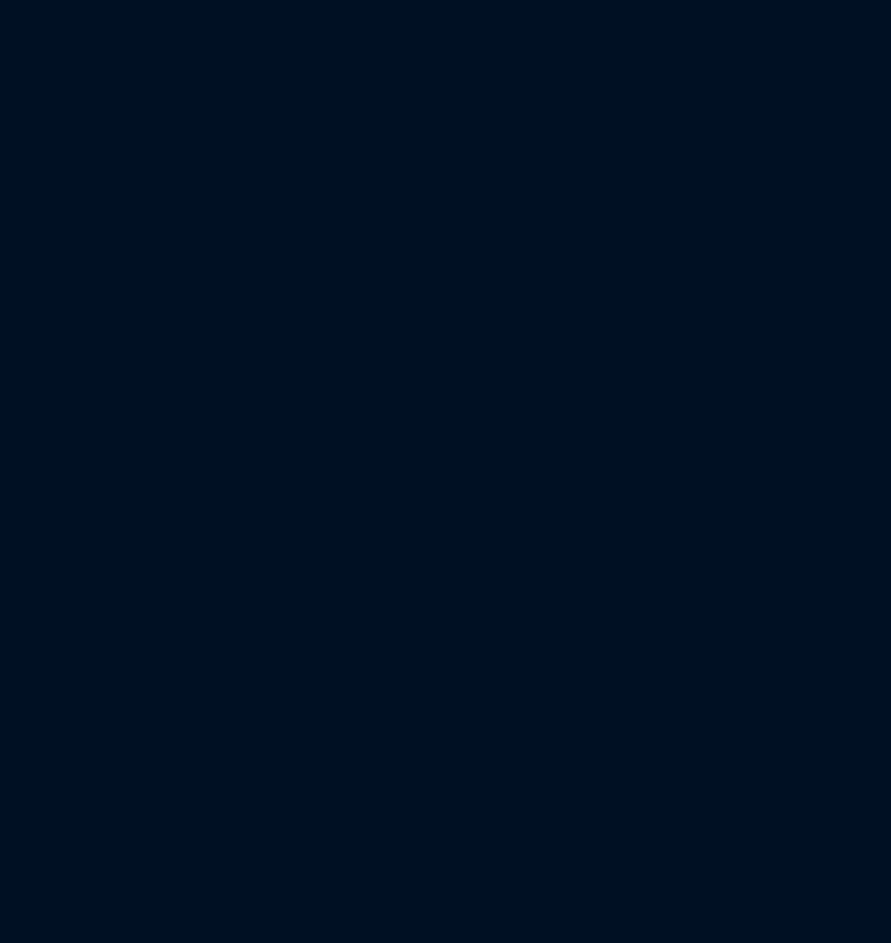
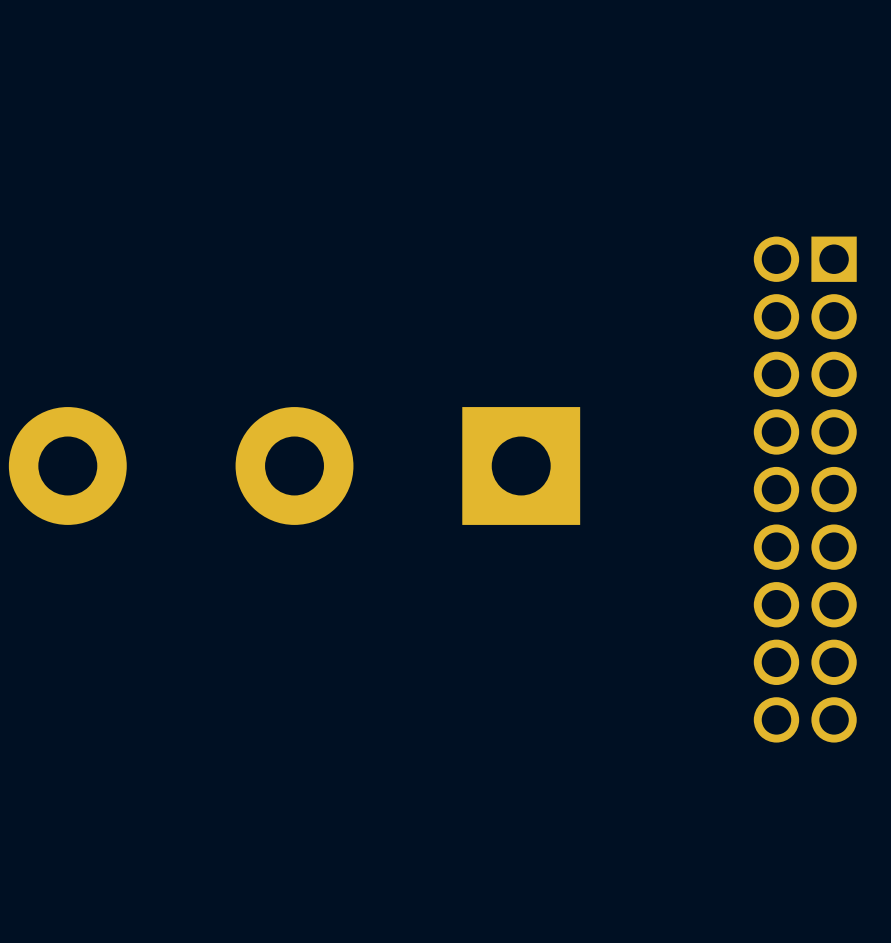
part: none -> (294, 465)
part: none -> (805, 489)

